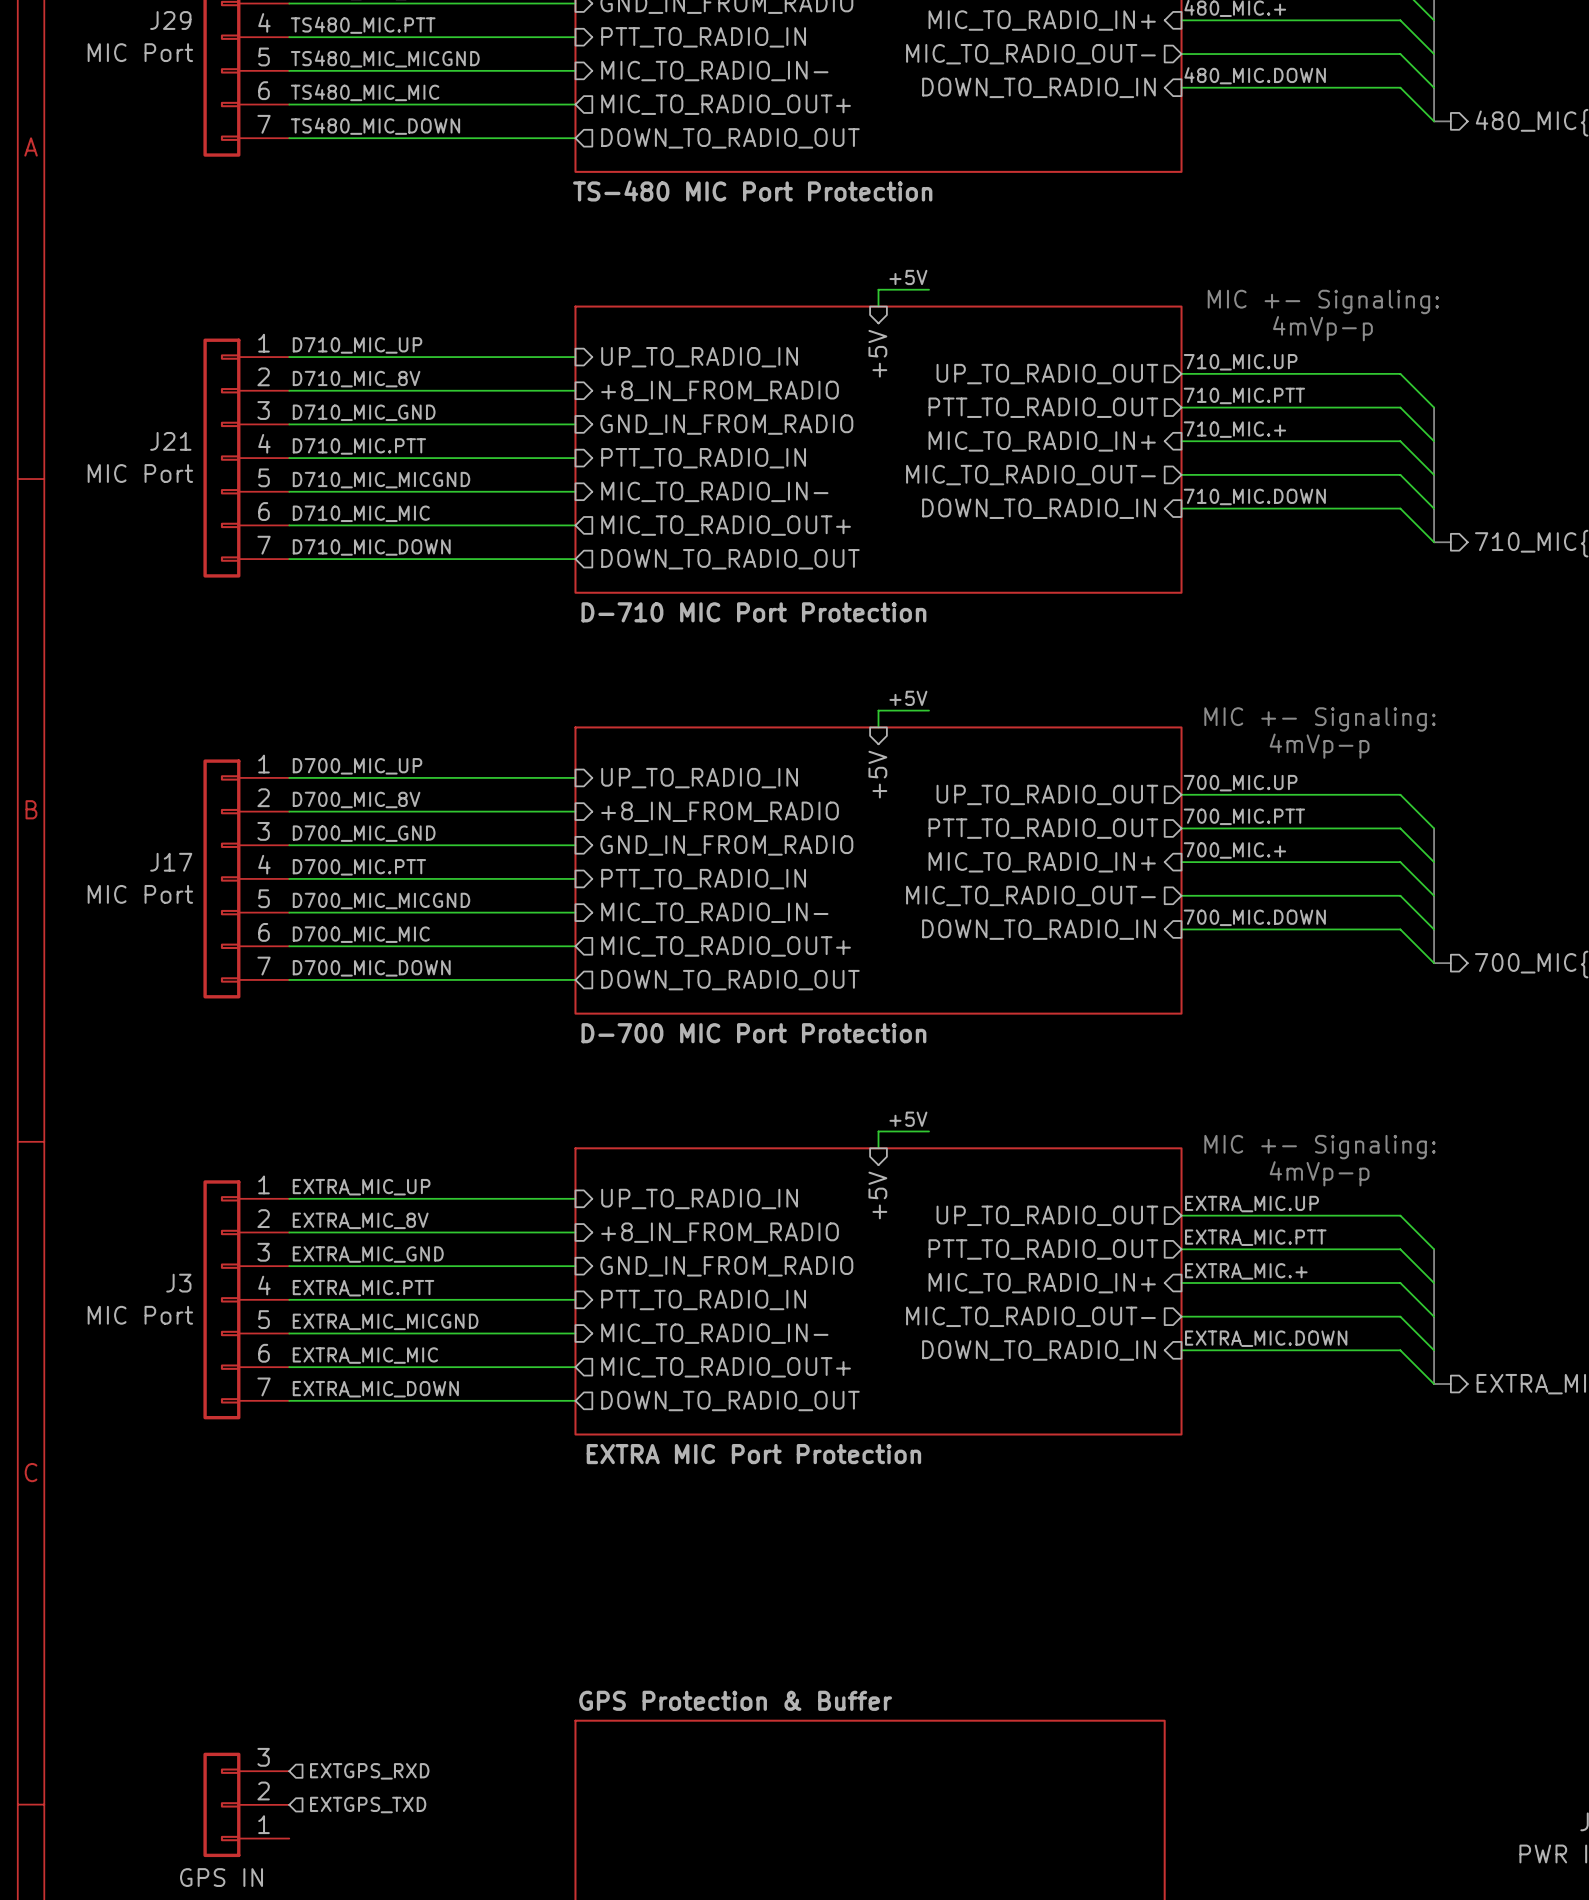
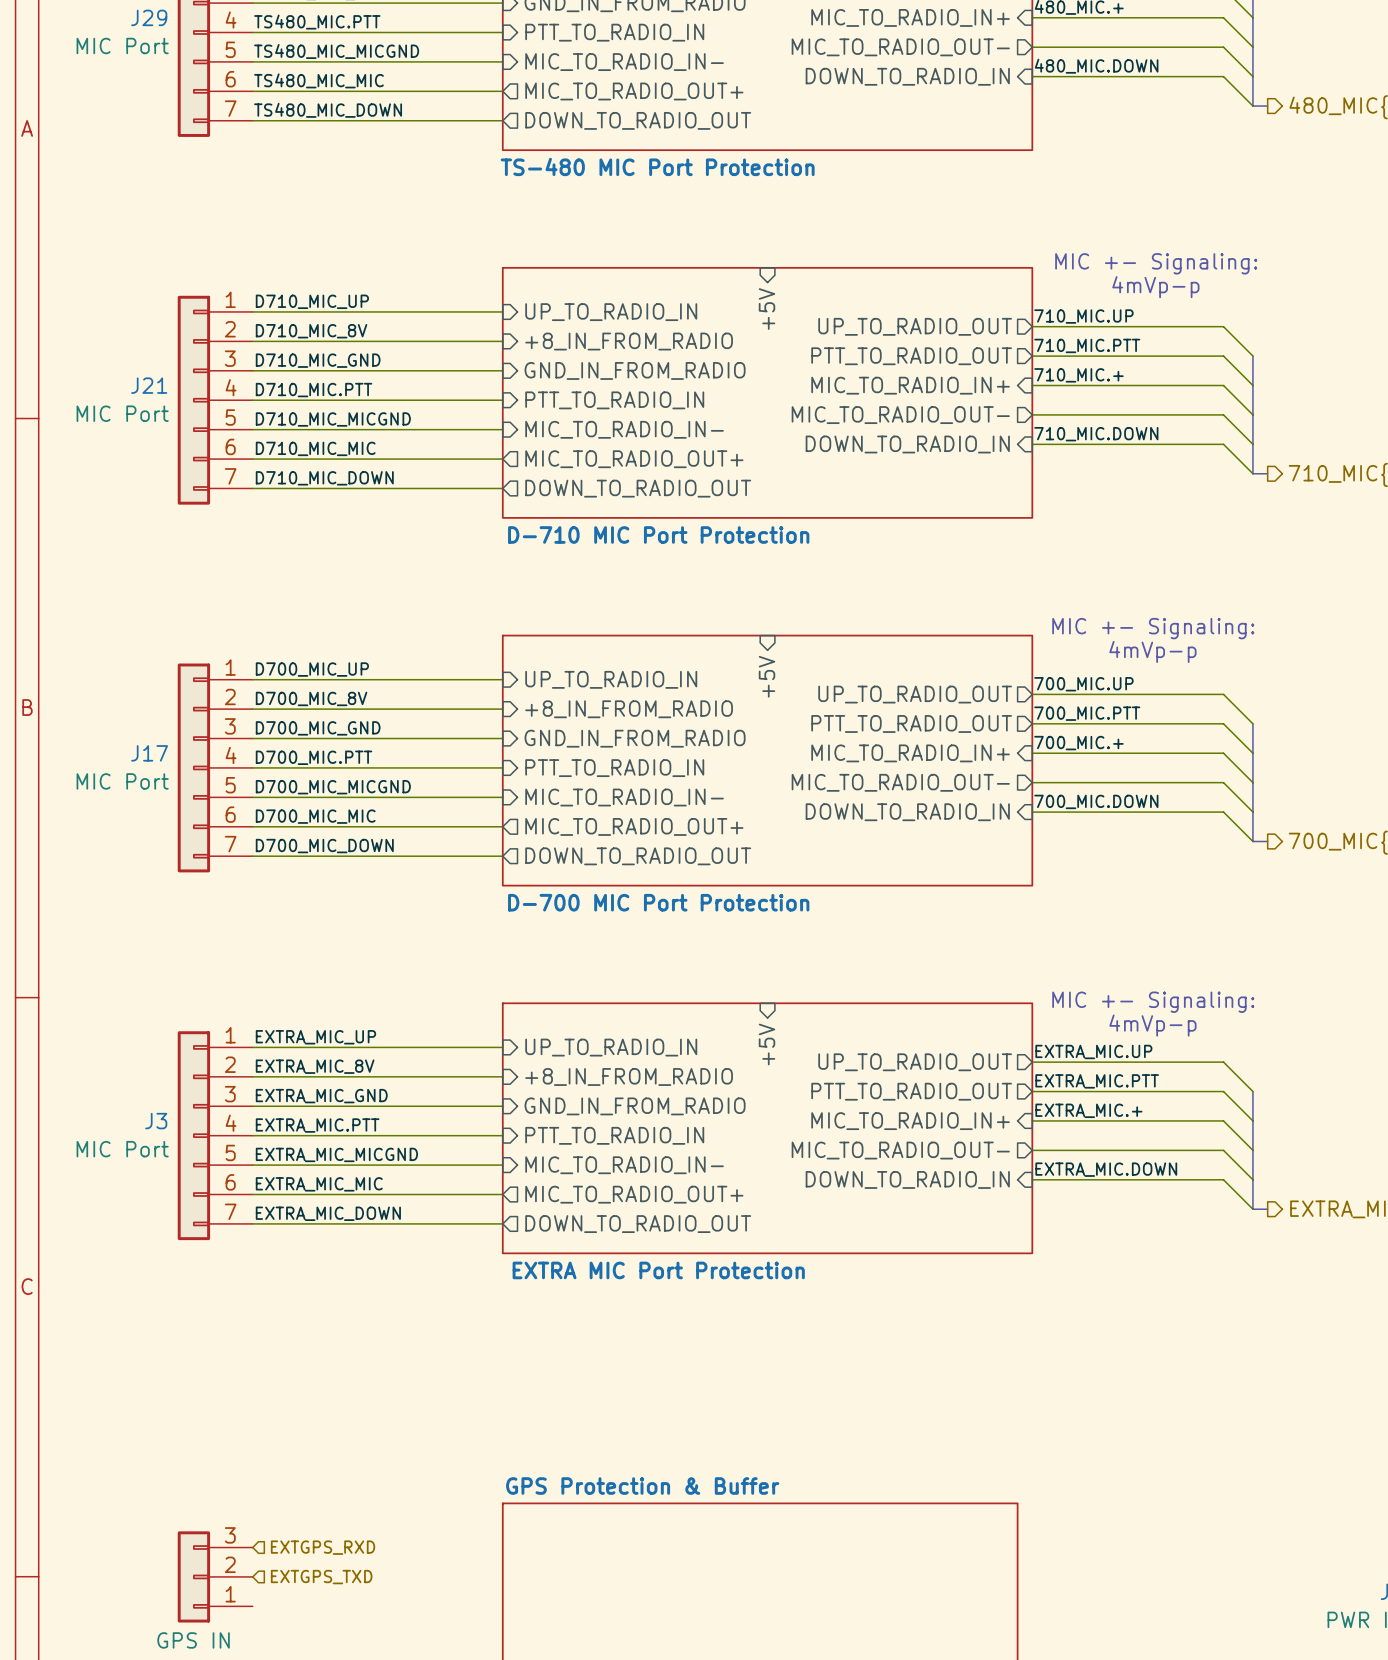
label: +5V (908, 277) -> none
wire: (929, 289) (878, 289) (878, 306) -> none
label: +5V (908, 698) -> none
wire: (929, 710) (878, 710) (878, 727) -> none
label: +5V (908, 1119) -> none
wire: (929, 1131) (878, 1131) (878, 1148) -> none

